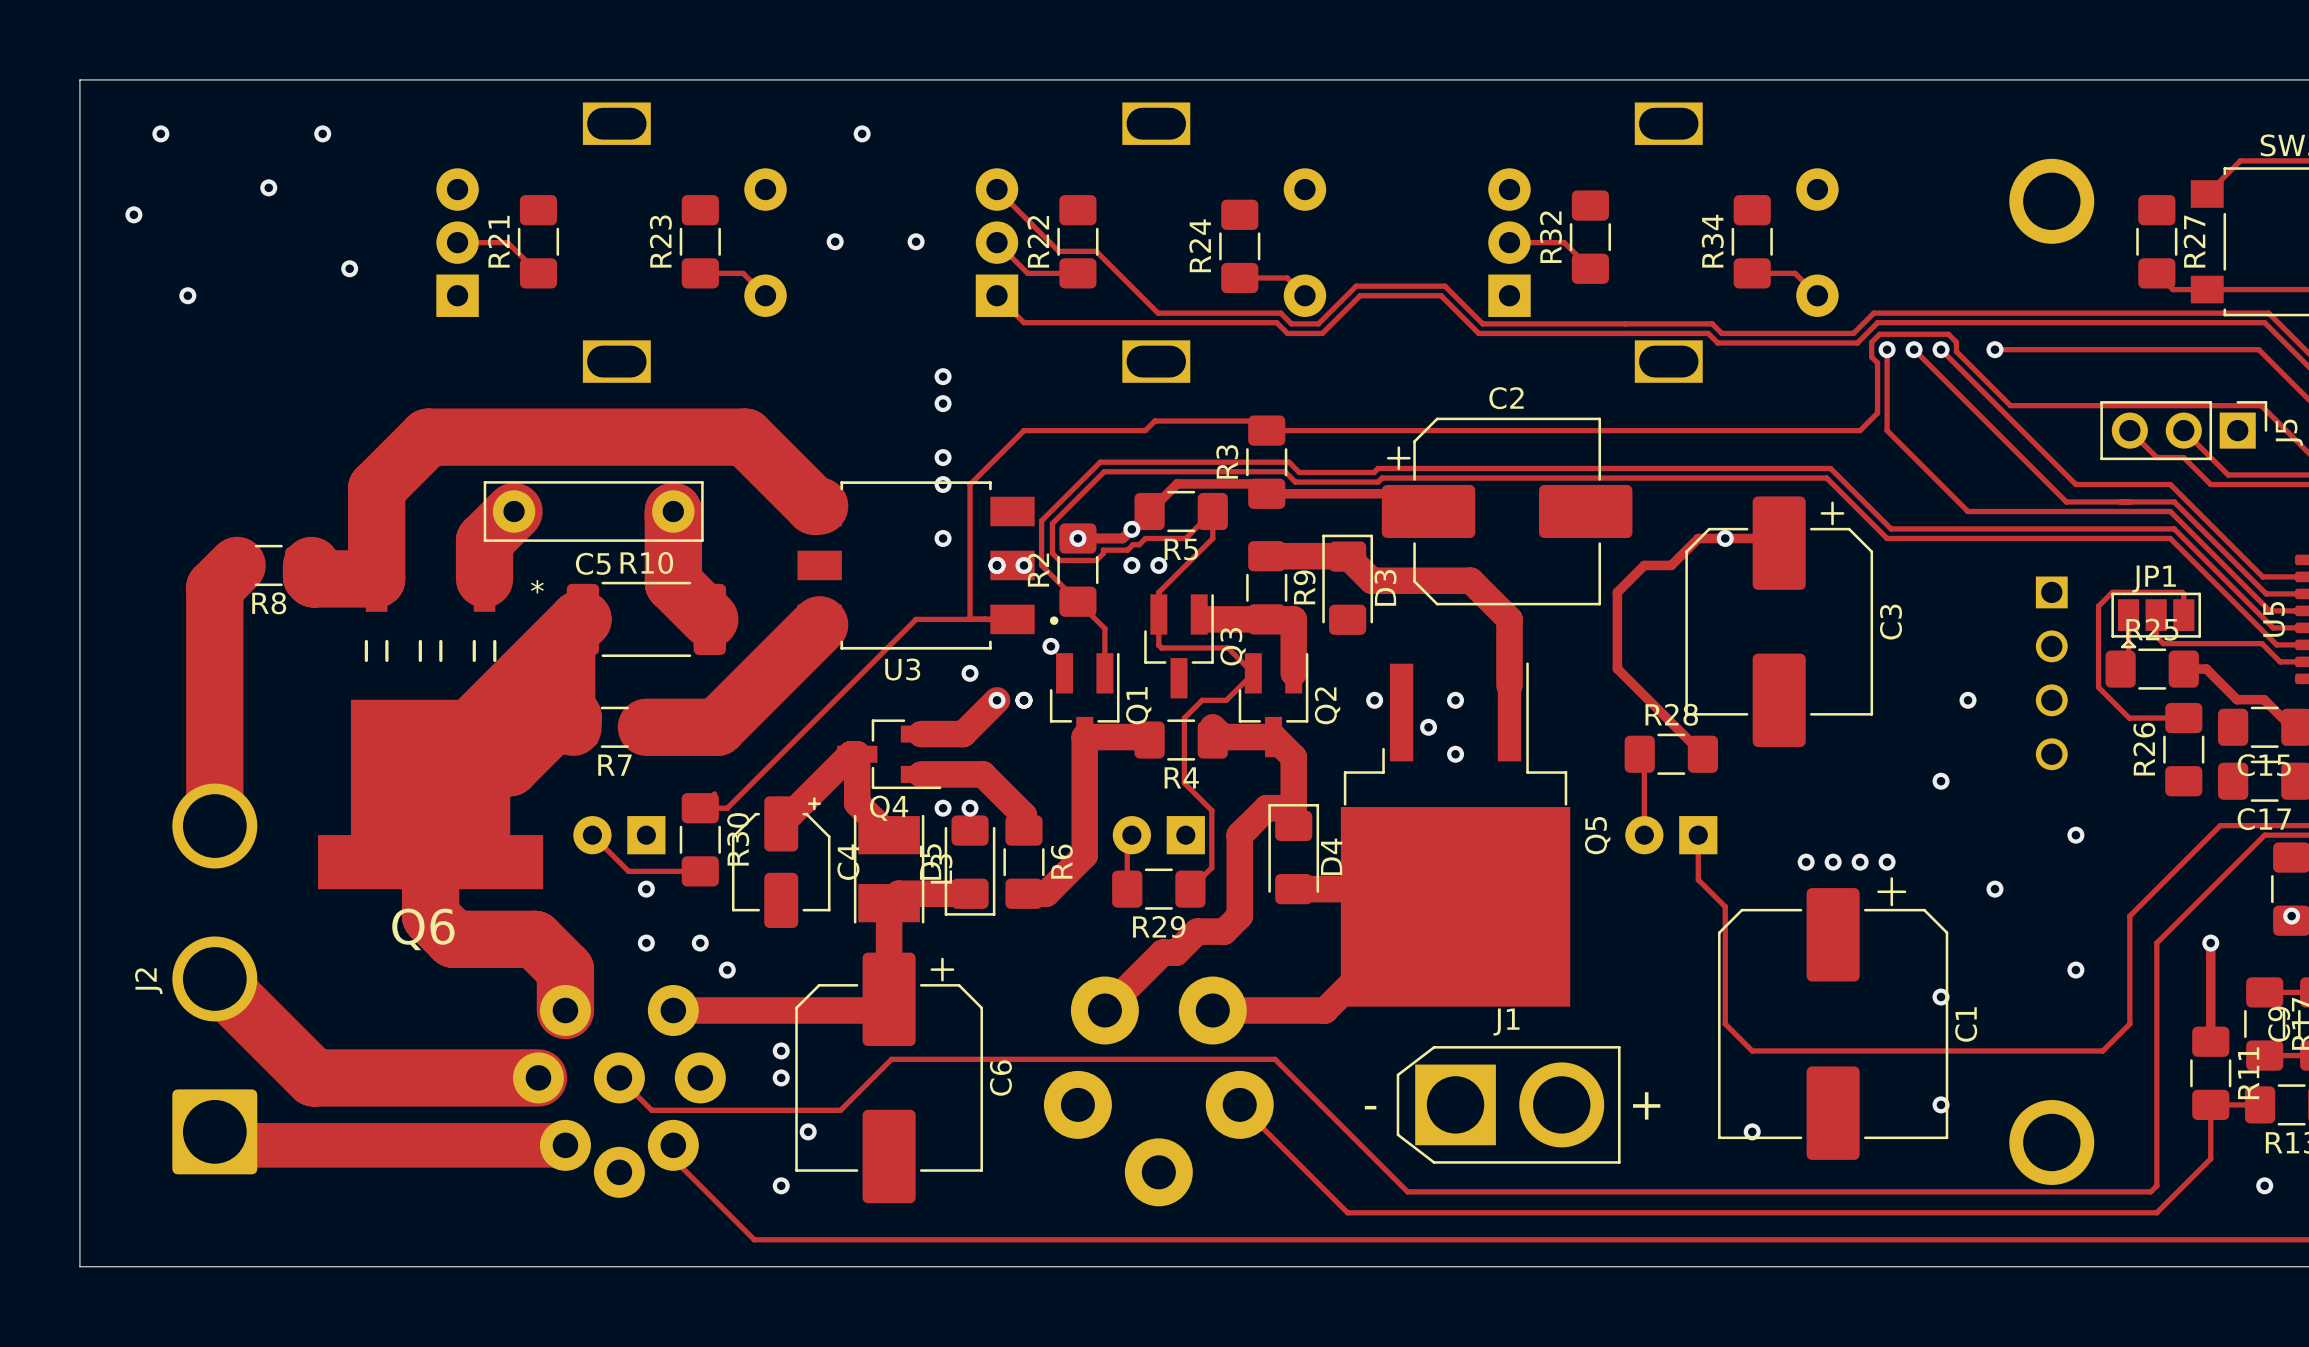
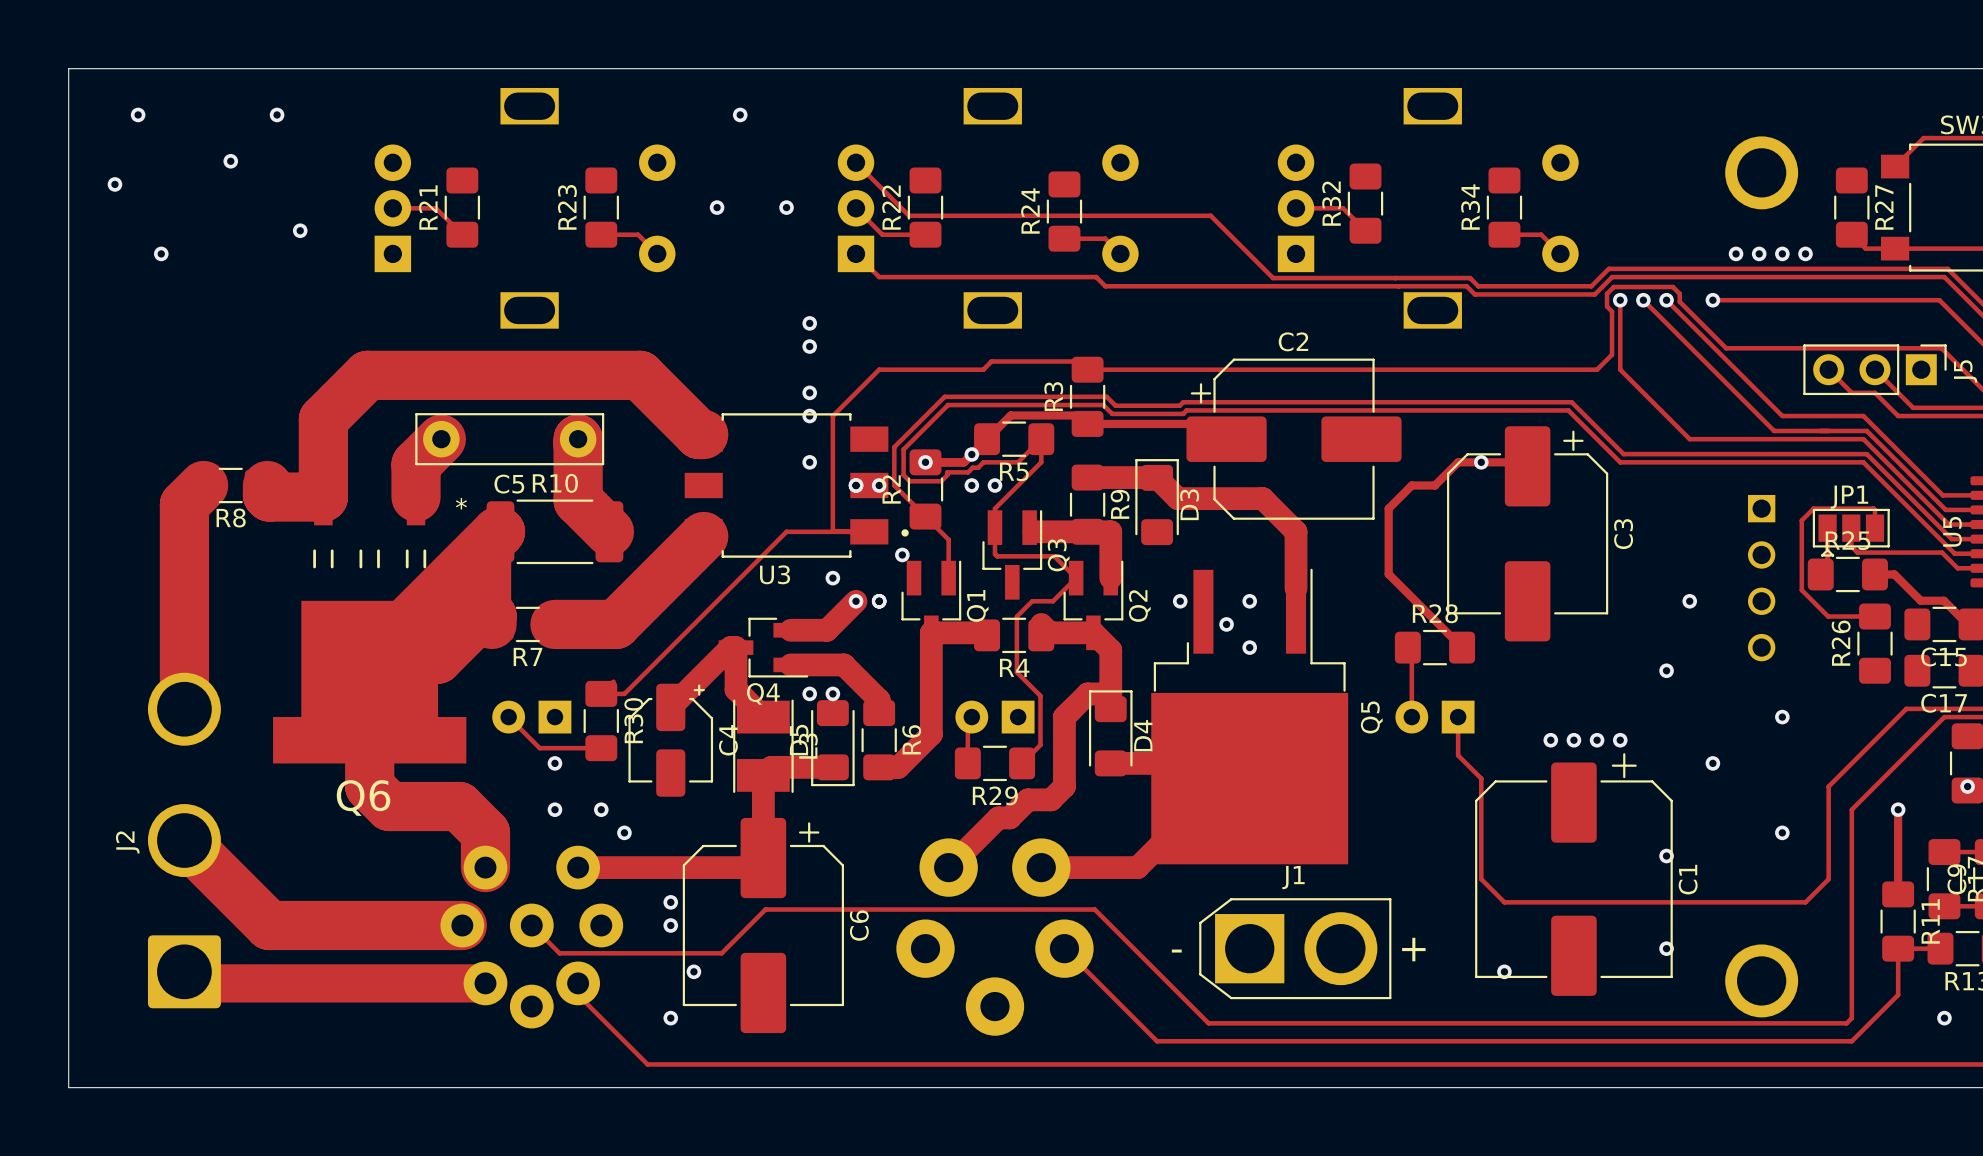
track: (1096, 251) (1158, 313) (1280, 313) (1291, 323) (1318, 323) (1356, 286) (1445, 286) -> (941, 215) (1210, 215) (1240, 245)
via: none -> (1736, 253)
via: none -> (1759, 253)
via: none -> (1782, 253)
via: none -> (1805, 253)
track: (1322, 333) (1360, 295) (1441, 295) (1478, 333) -> (1135, 286) (1269, 286)

